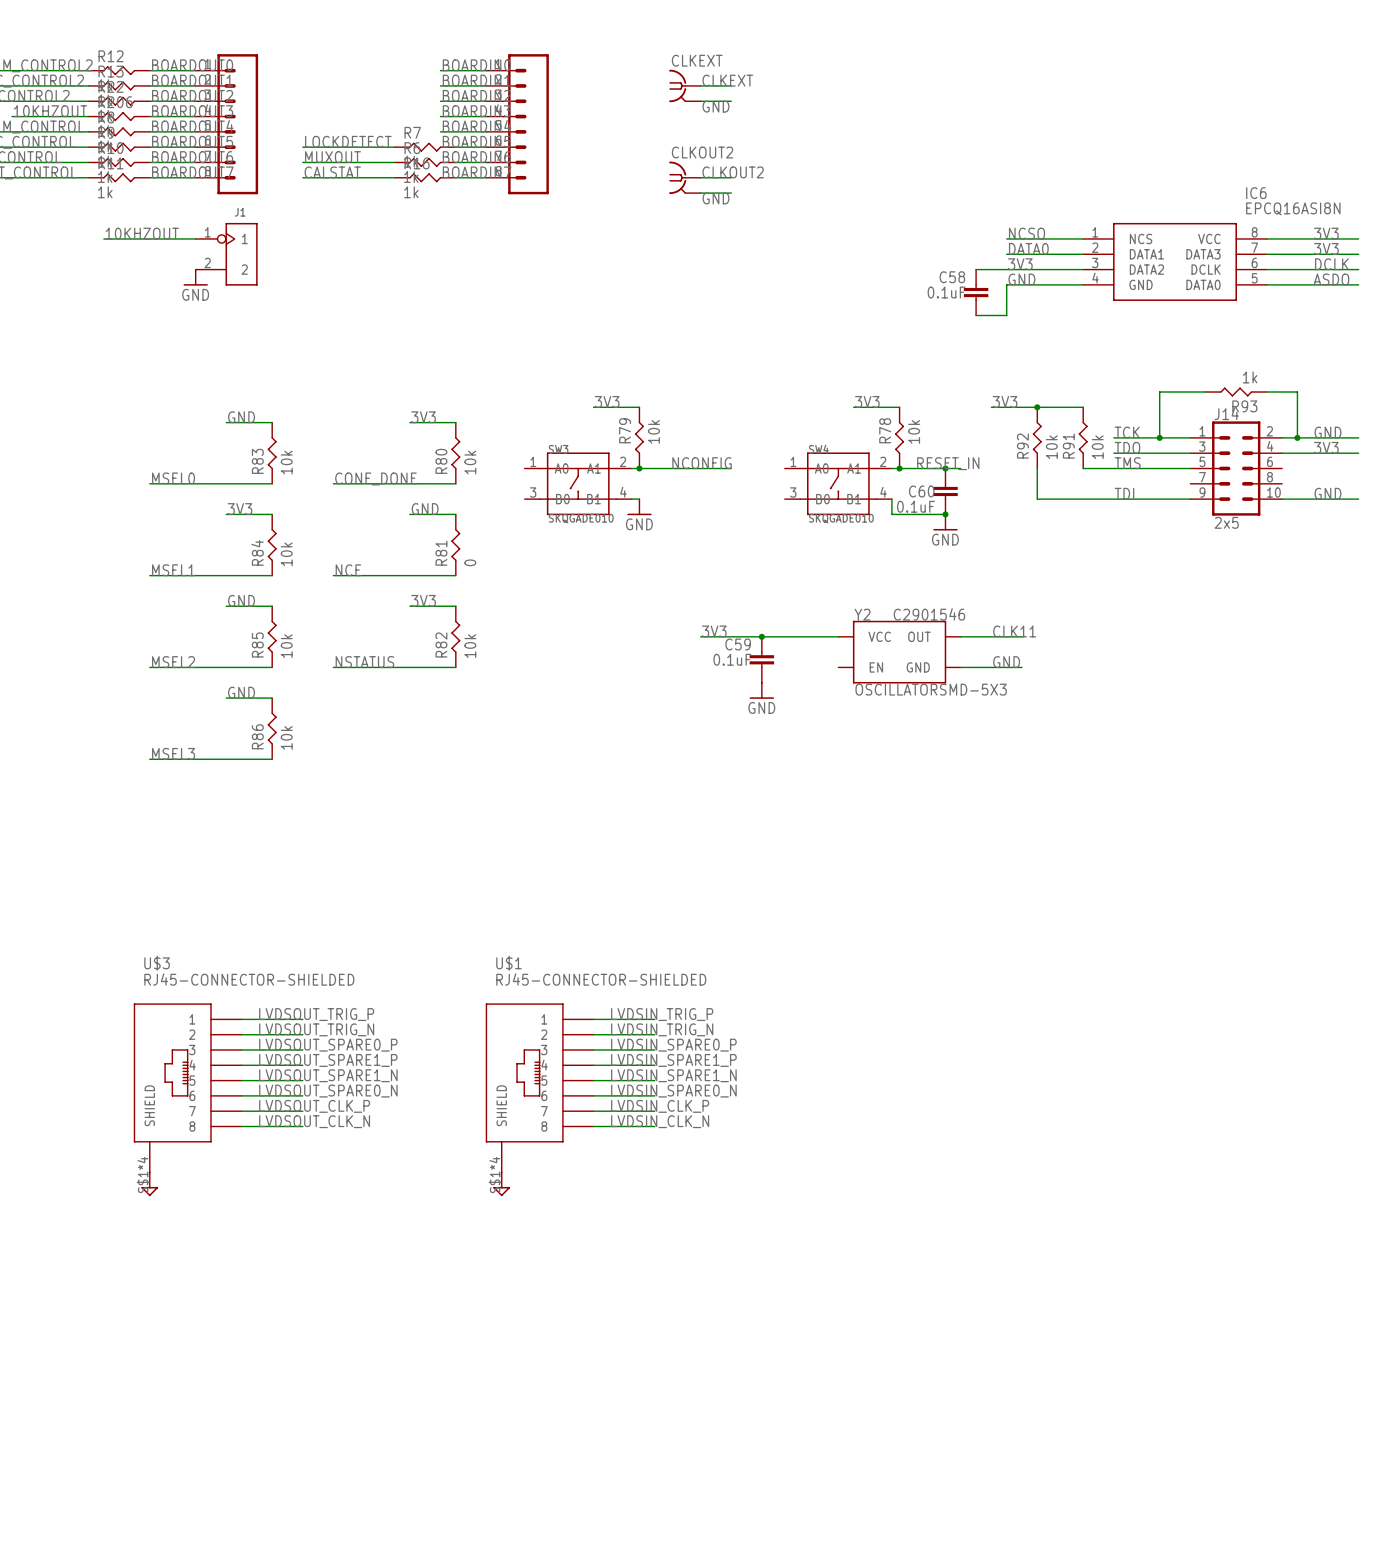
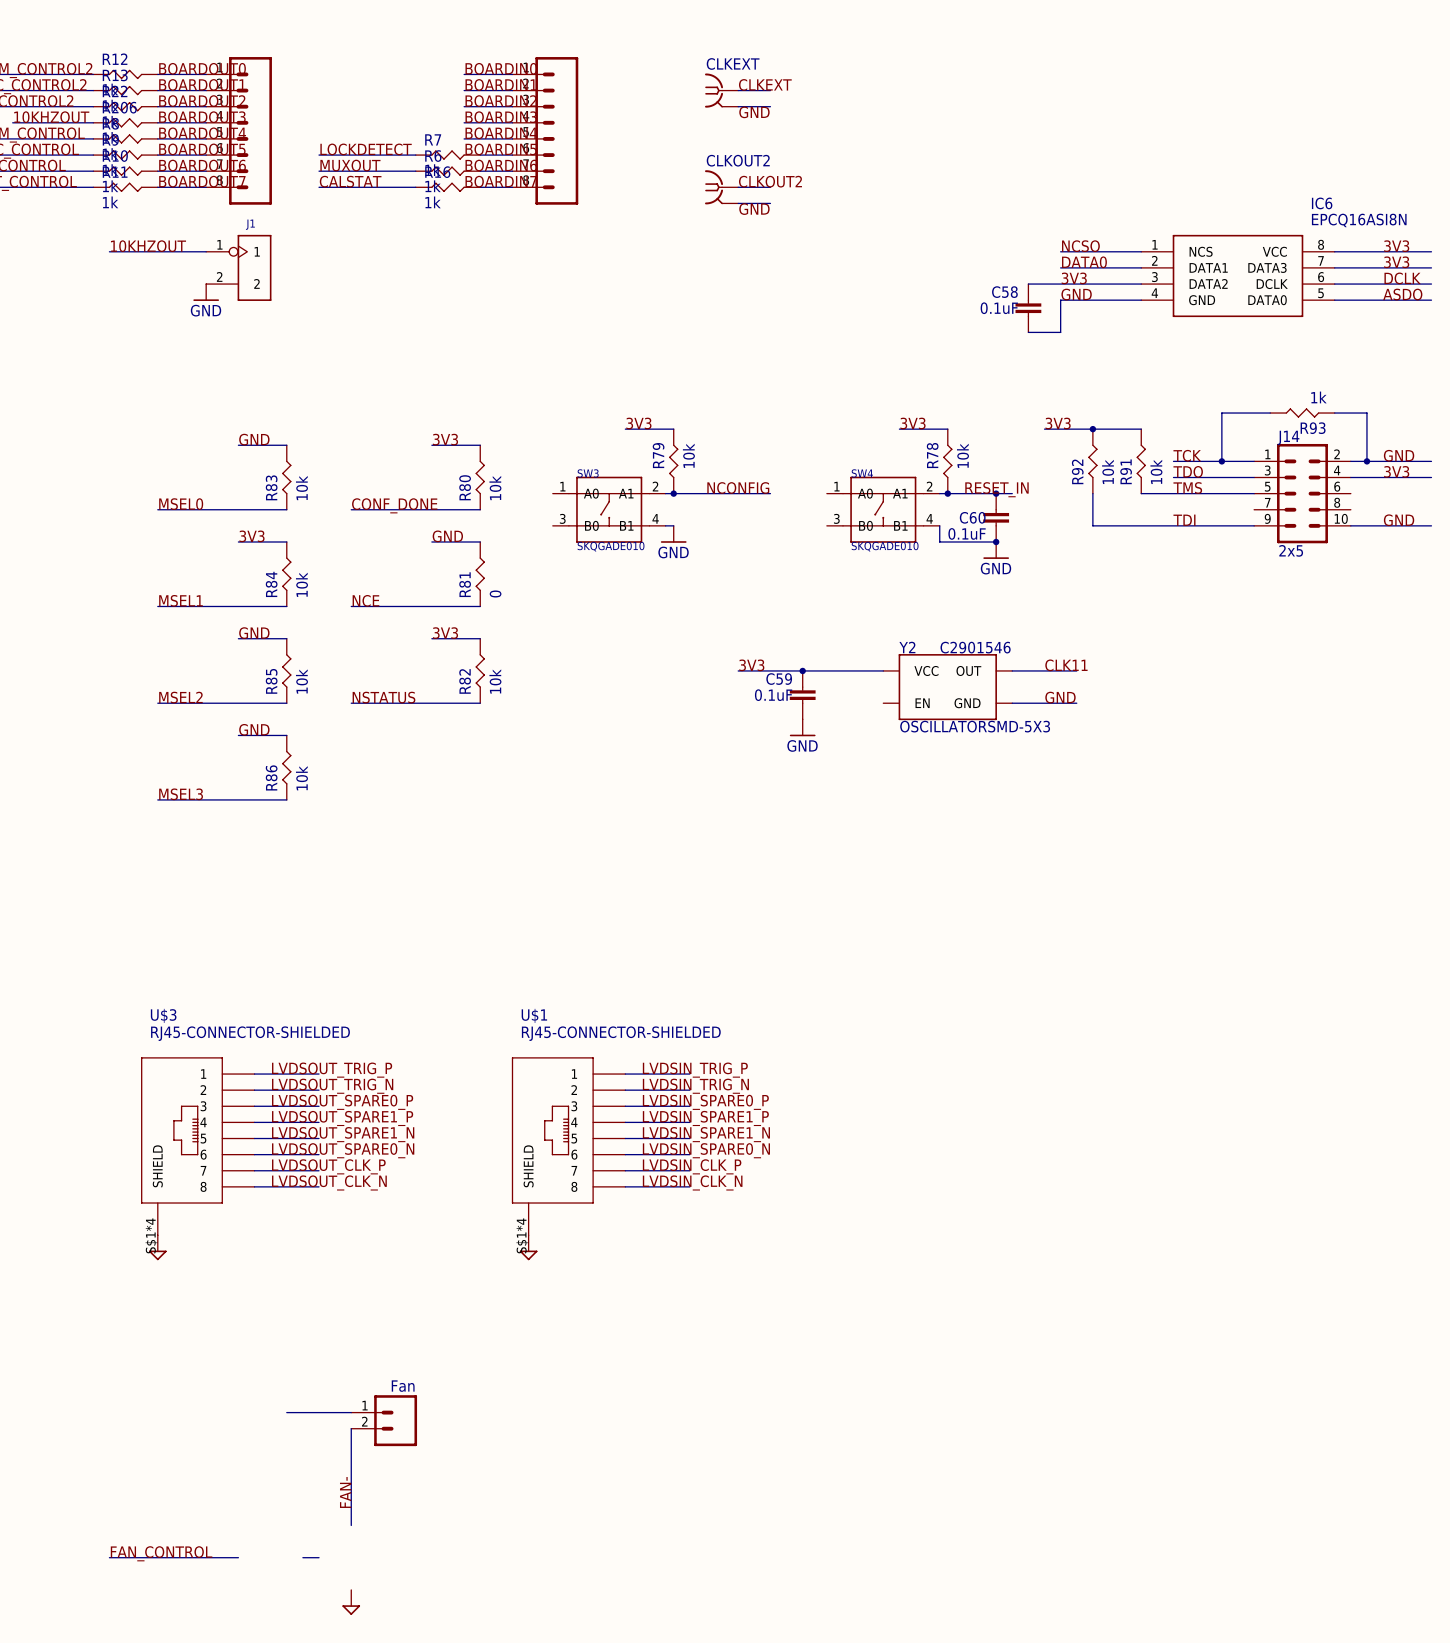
wire: none -> (286, 1412) (351, 1412)
part: none -> Fan (384, 1420)
wire: none -> (351, 1428) (351, 1525)
label: none -> FAN- (345, 1492)
label: none -> FAN_CONTROL (161, 1553)
wire: none -> (109, 1557) (238, 1557)
wire: none -> (302, 1557) (319, 1557)
power symbol: none -> (351, 1602)

